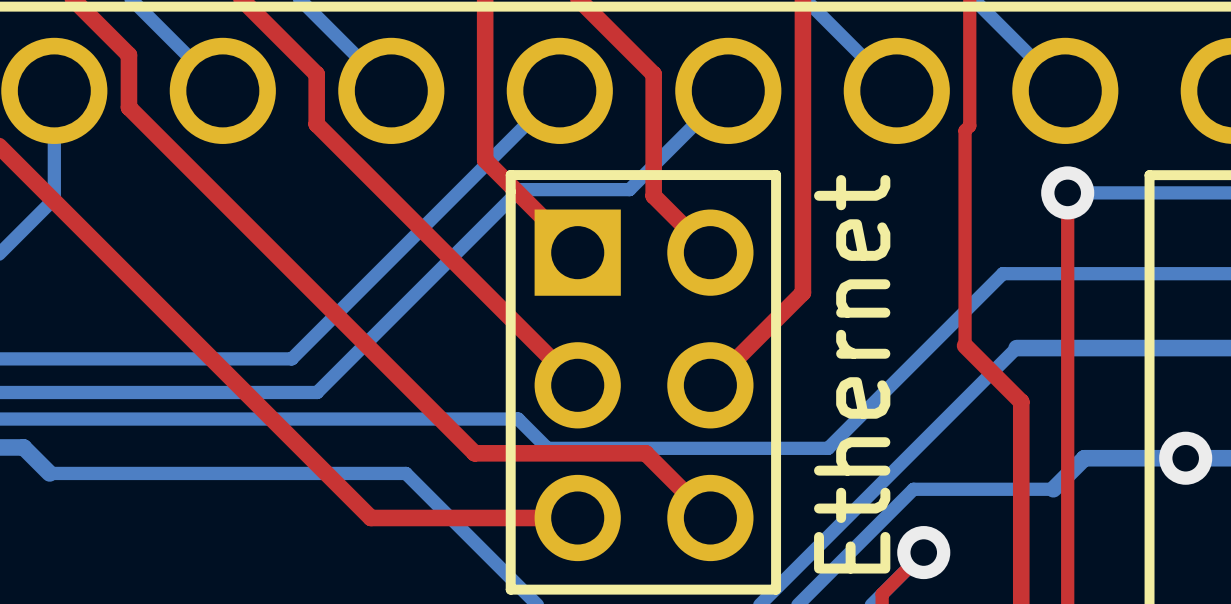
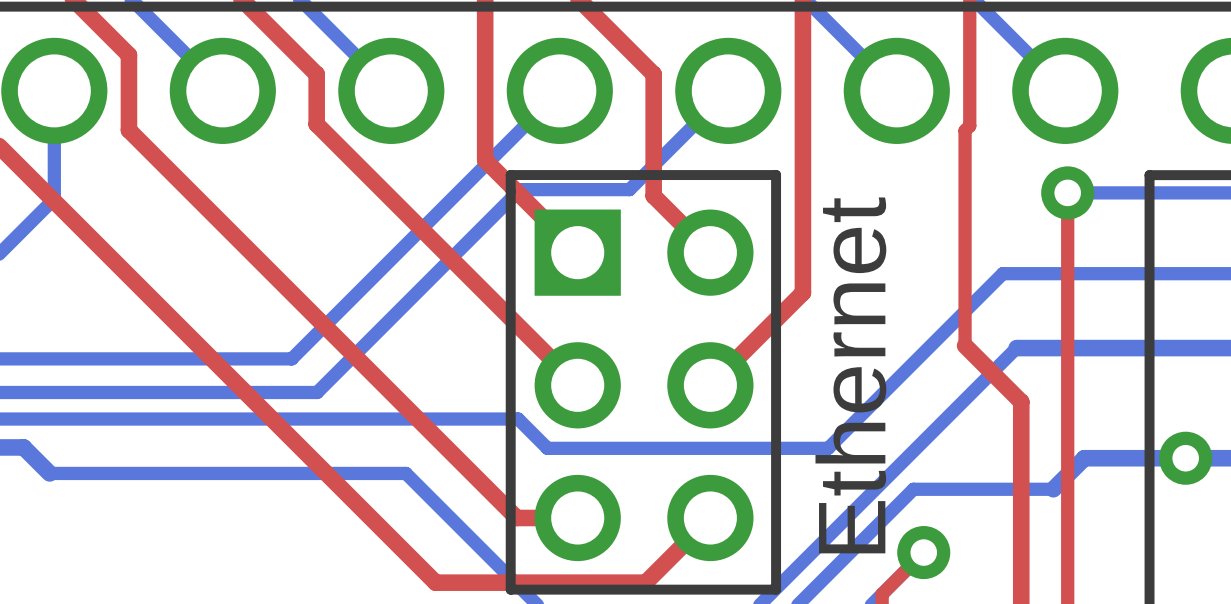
top track: (128, 107) (474, 453) (645, 453) (710, 517) -> (128, 107) (128, 130) (516, 517)
top track: (370, 517) (516, 517) -> (370, 517) (435, 582) (645, 582) (710, 517)

